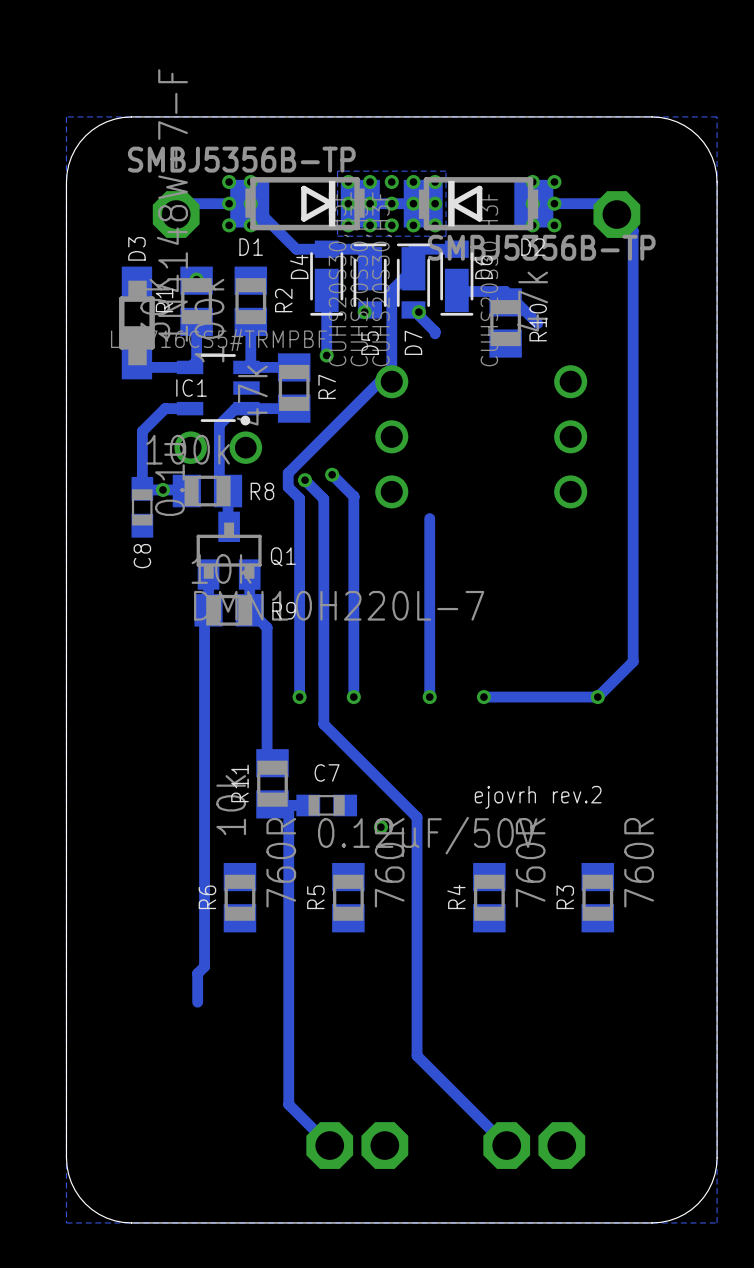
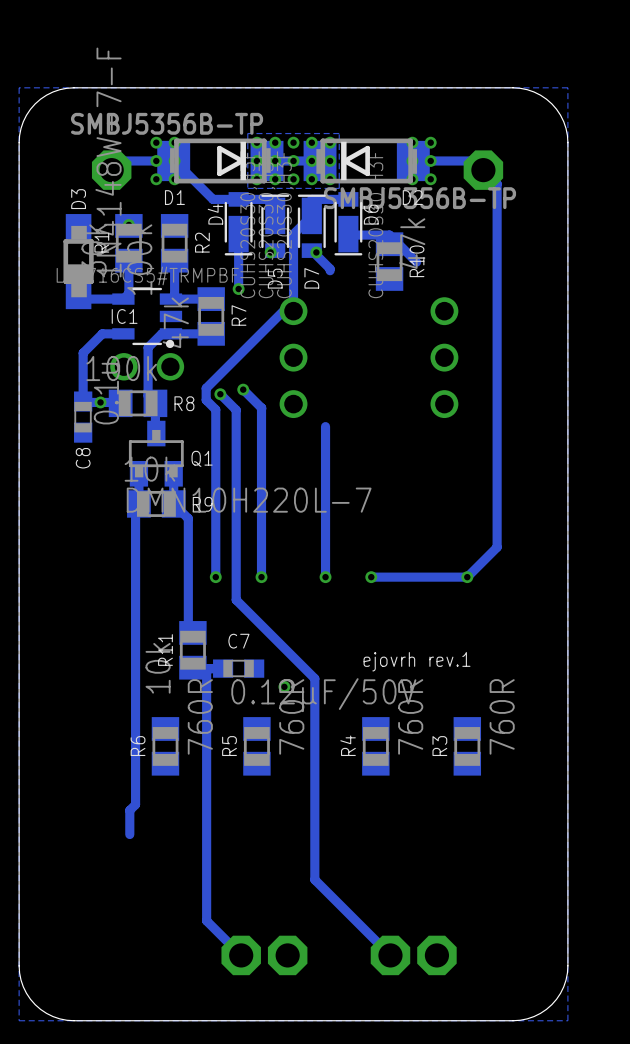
text: ejovrh rev.2 (538, 797) -> ejovrh rev.1 (417, 661)

